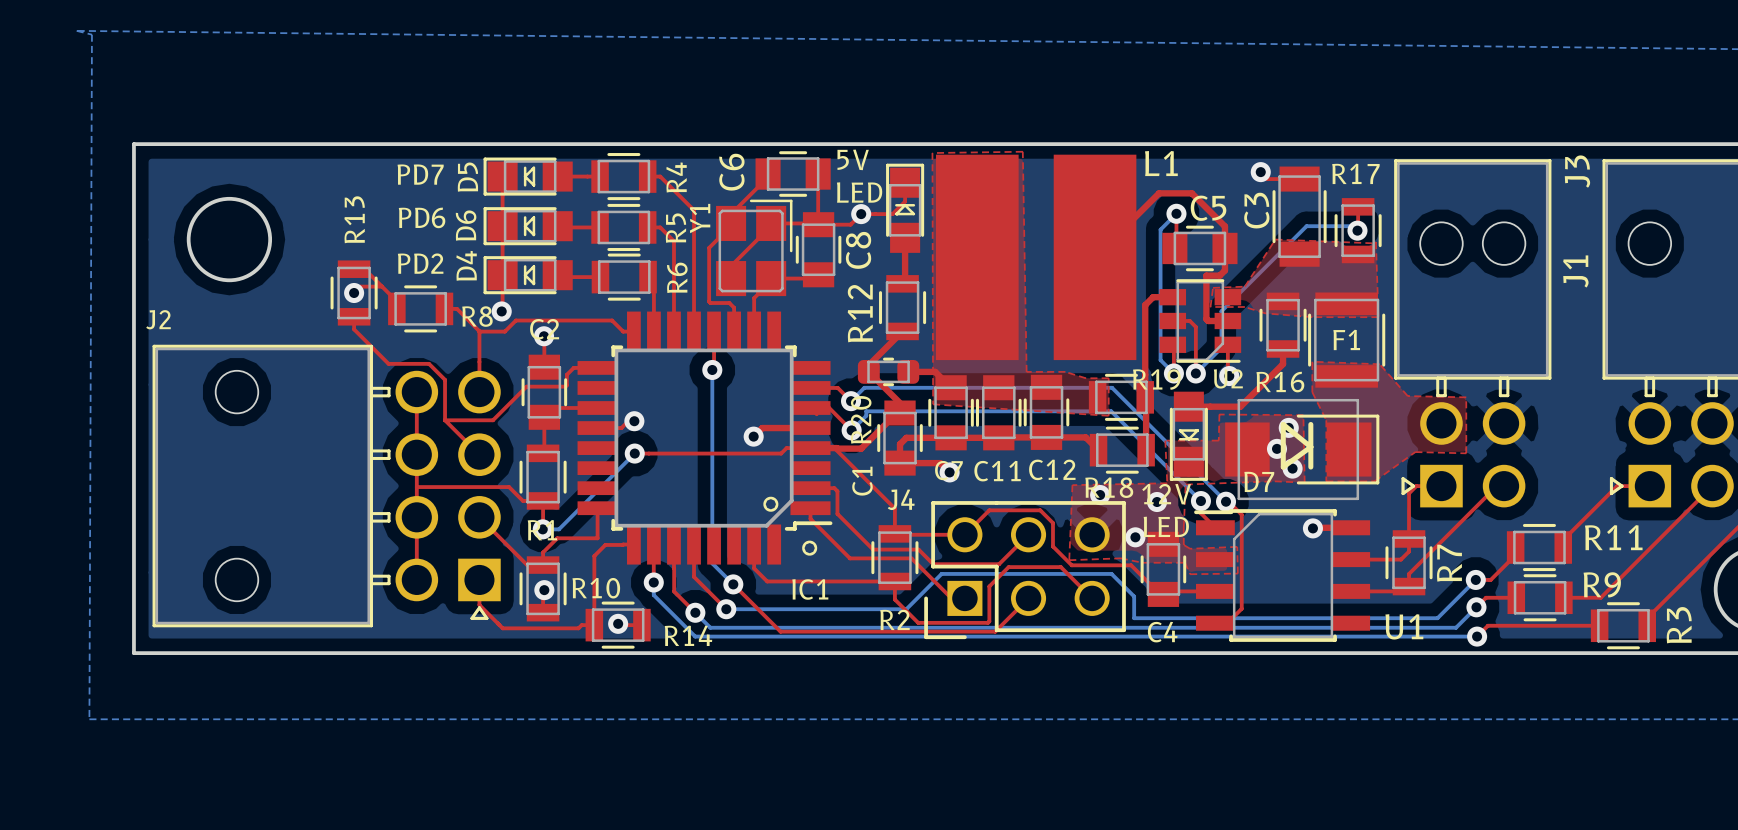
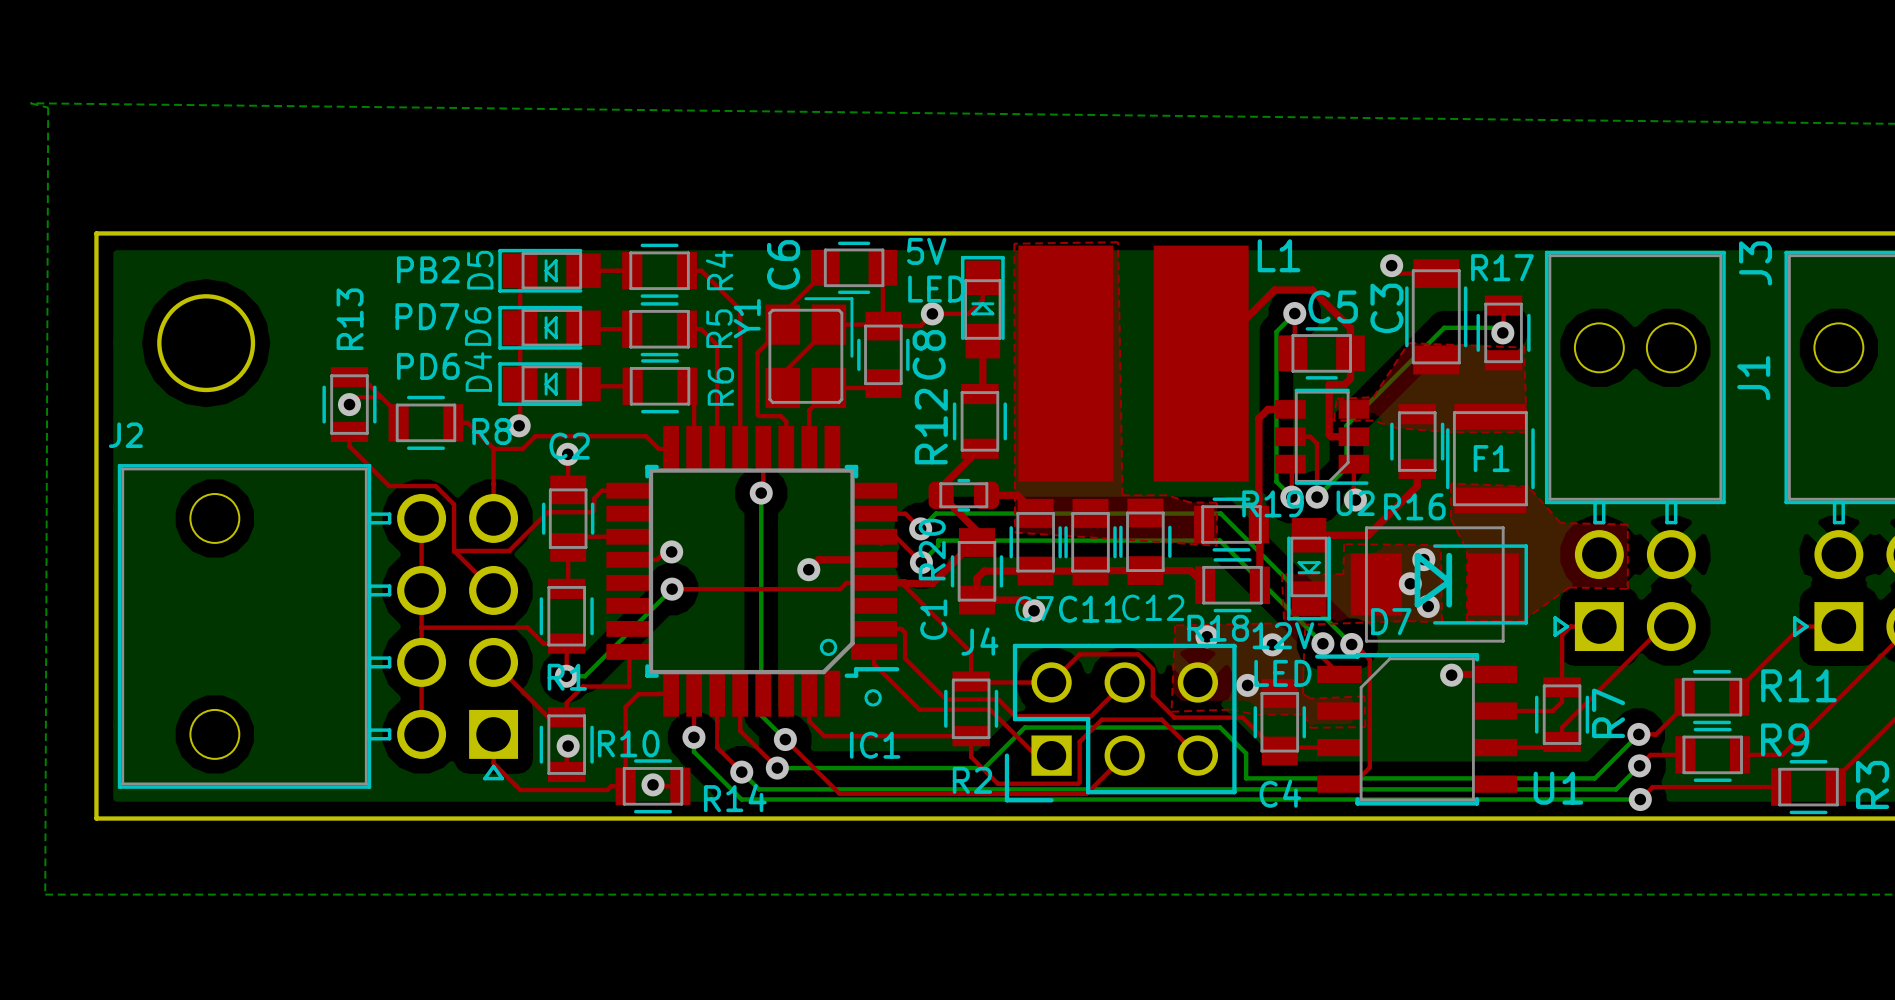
text: PD7 (420, 174) -> PB2 (428, 269)
text: PD6 (422, 217) -> PD7 (427, 316)
text: PD2 (420, 263) -> PD6 (428, 366)

